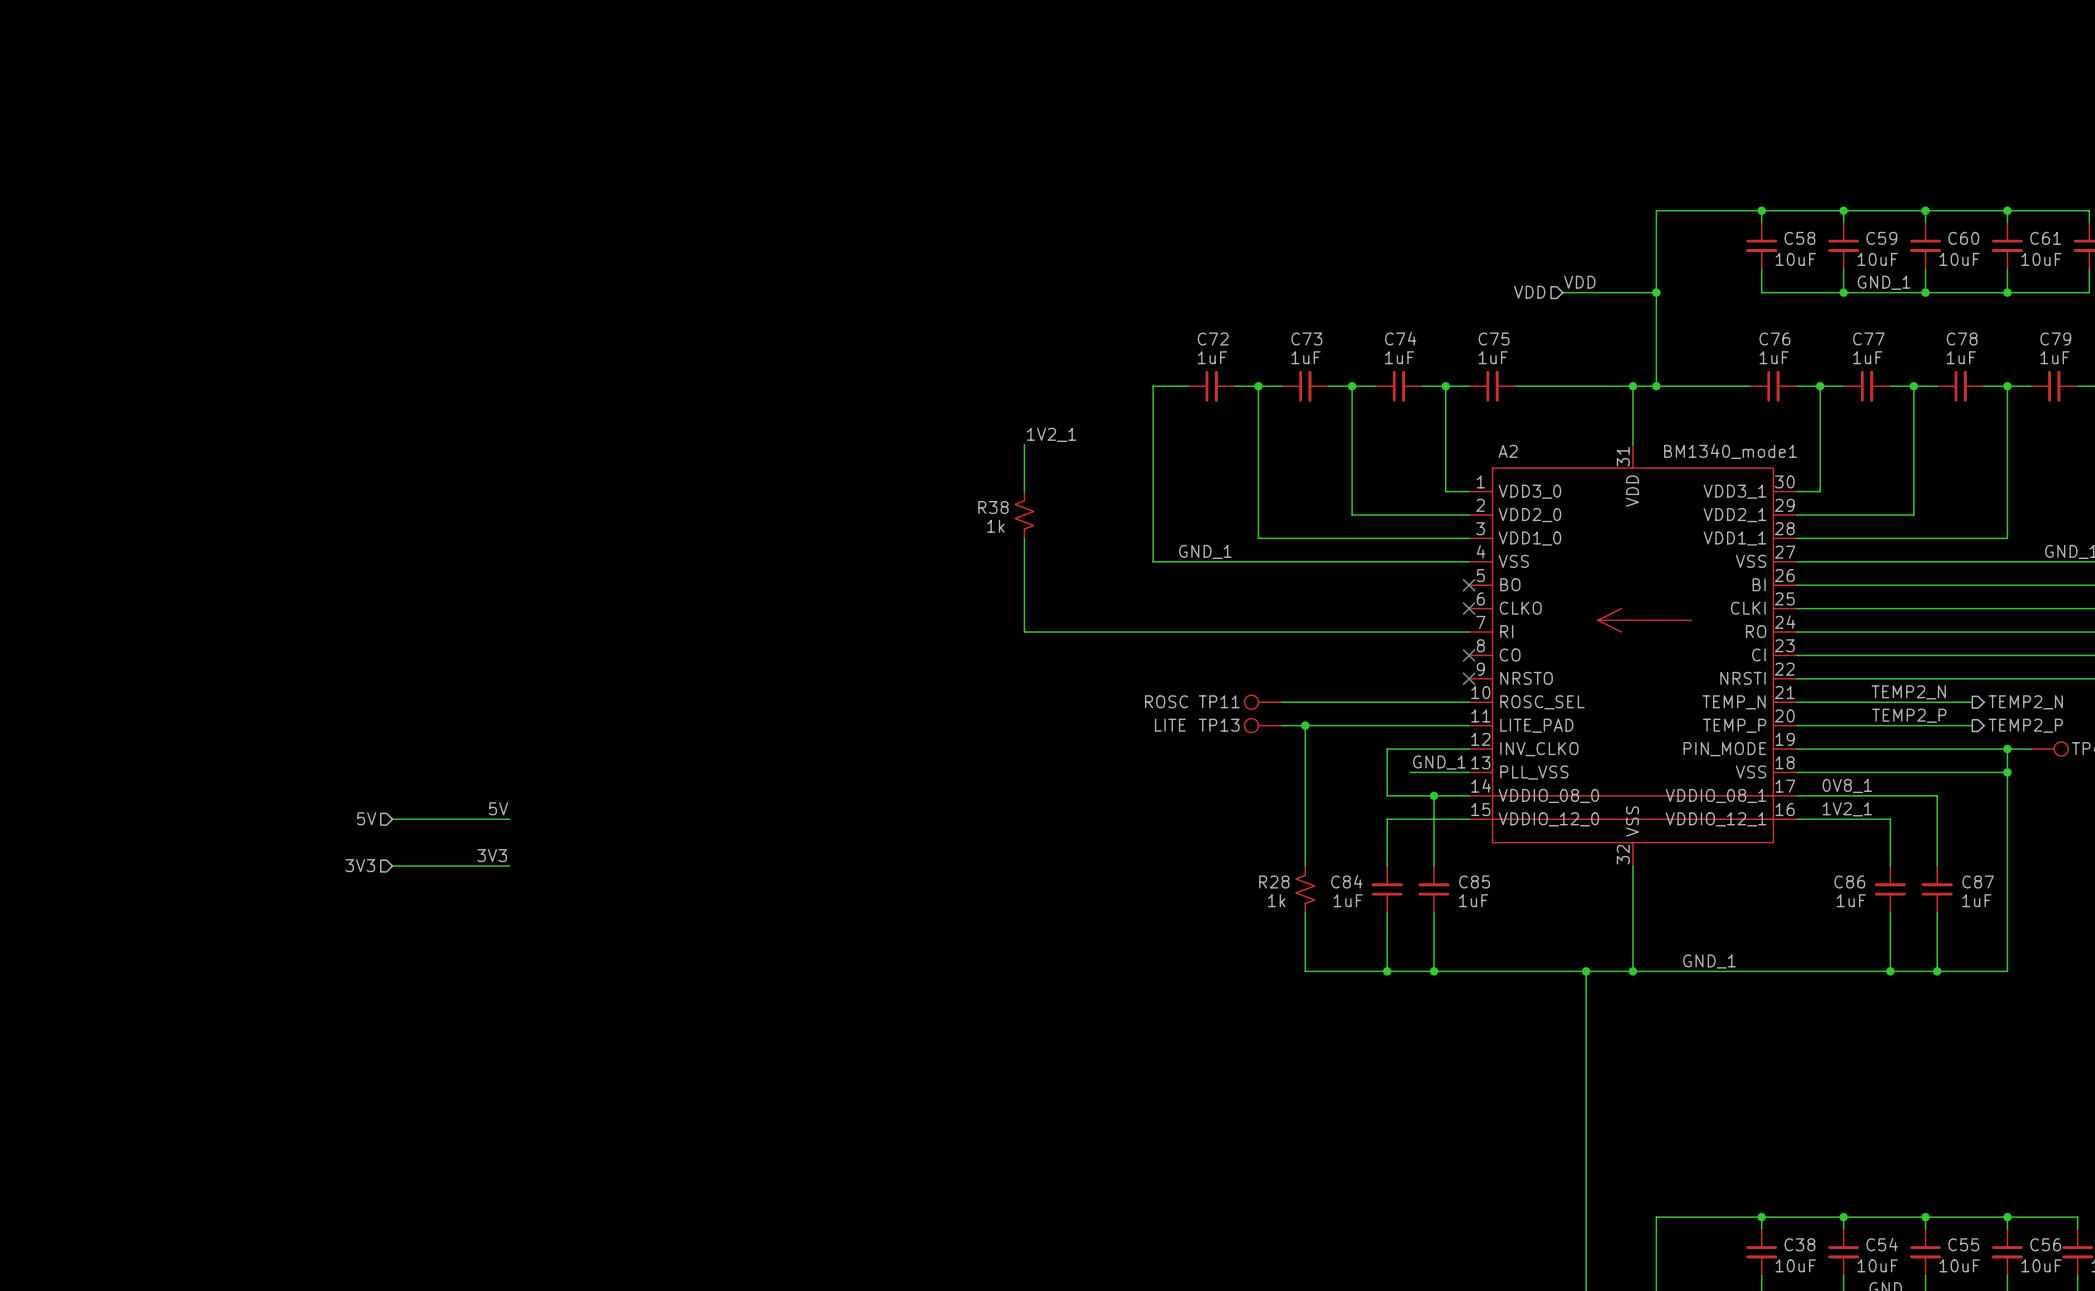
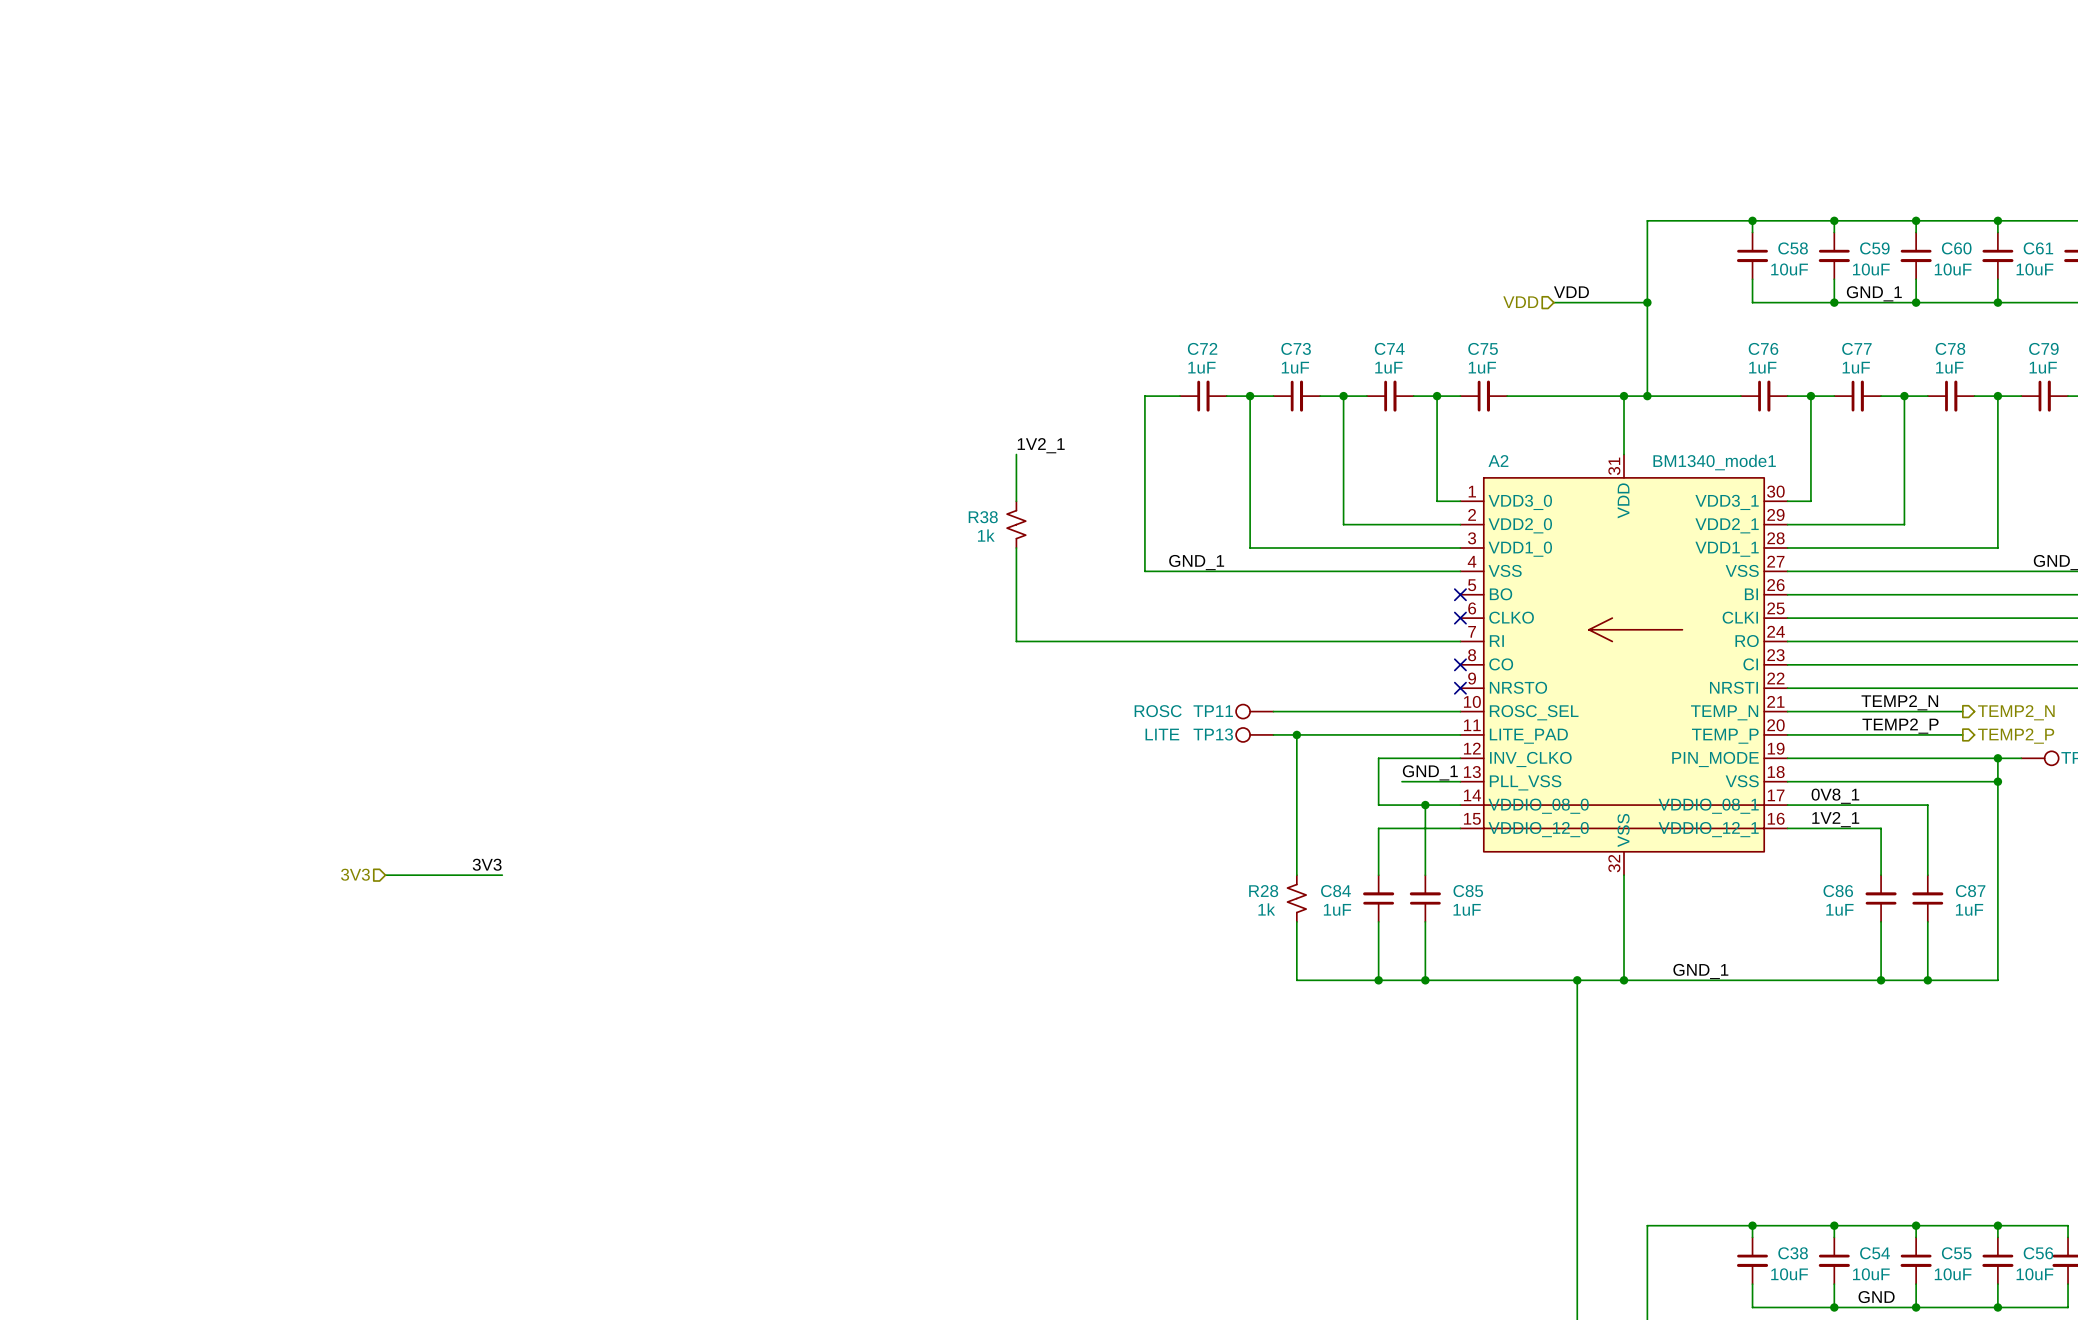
label: 5V (498, 808) -> none
hierarchical label: 5V (366, 818) -> none
wire: (392, 819) (509, 819) -> none

